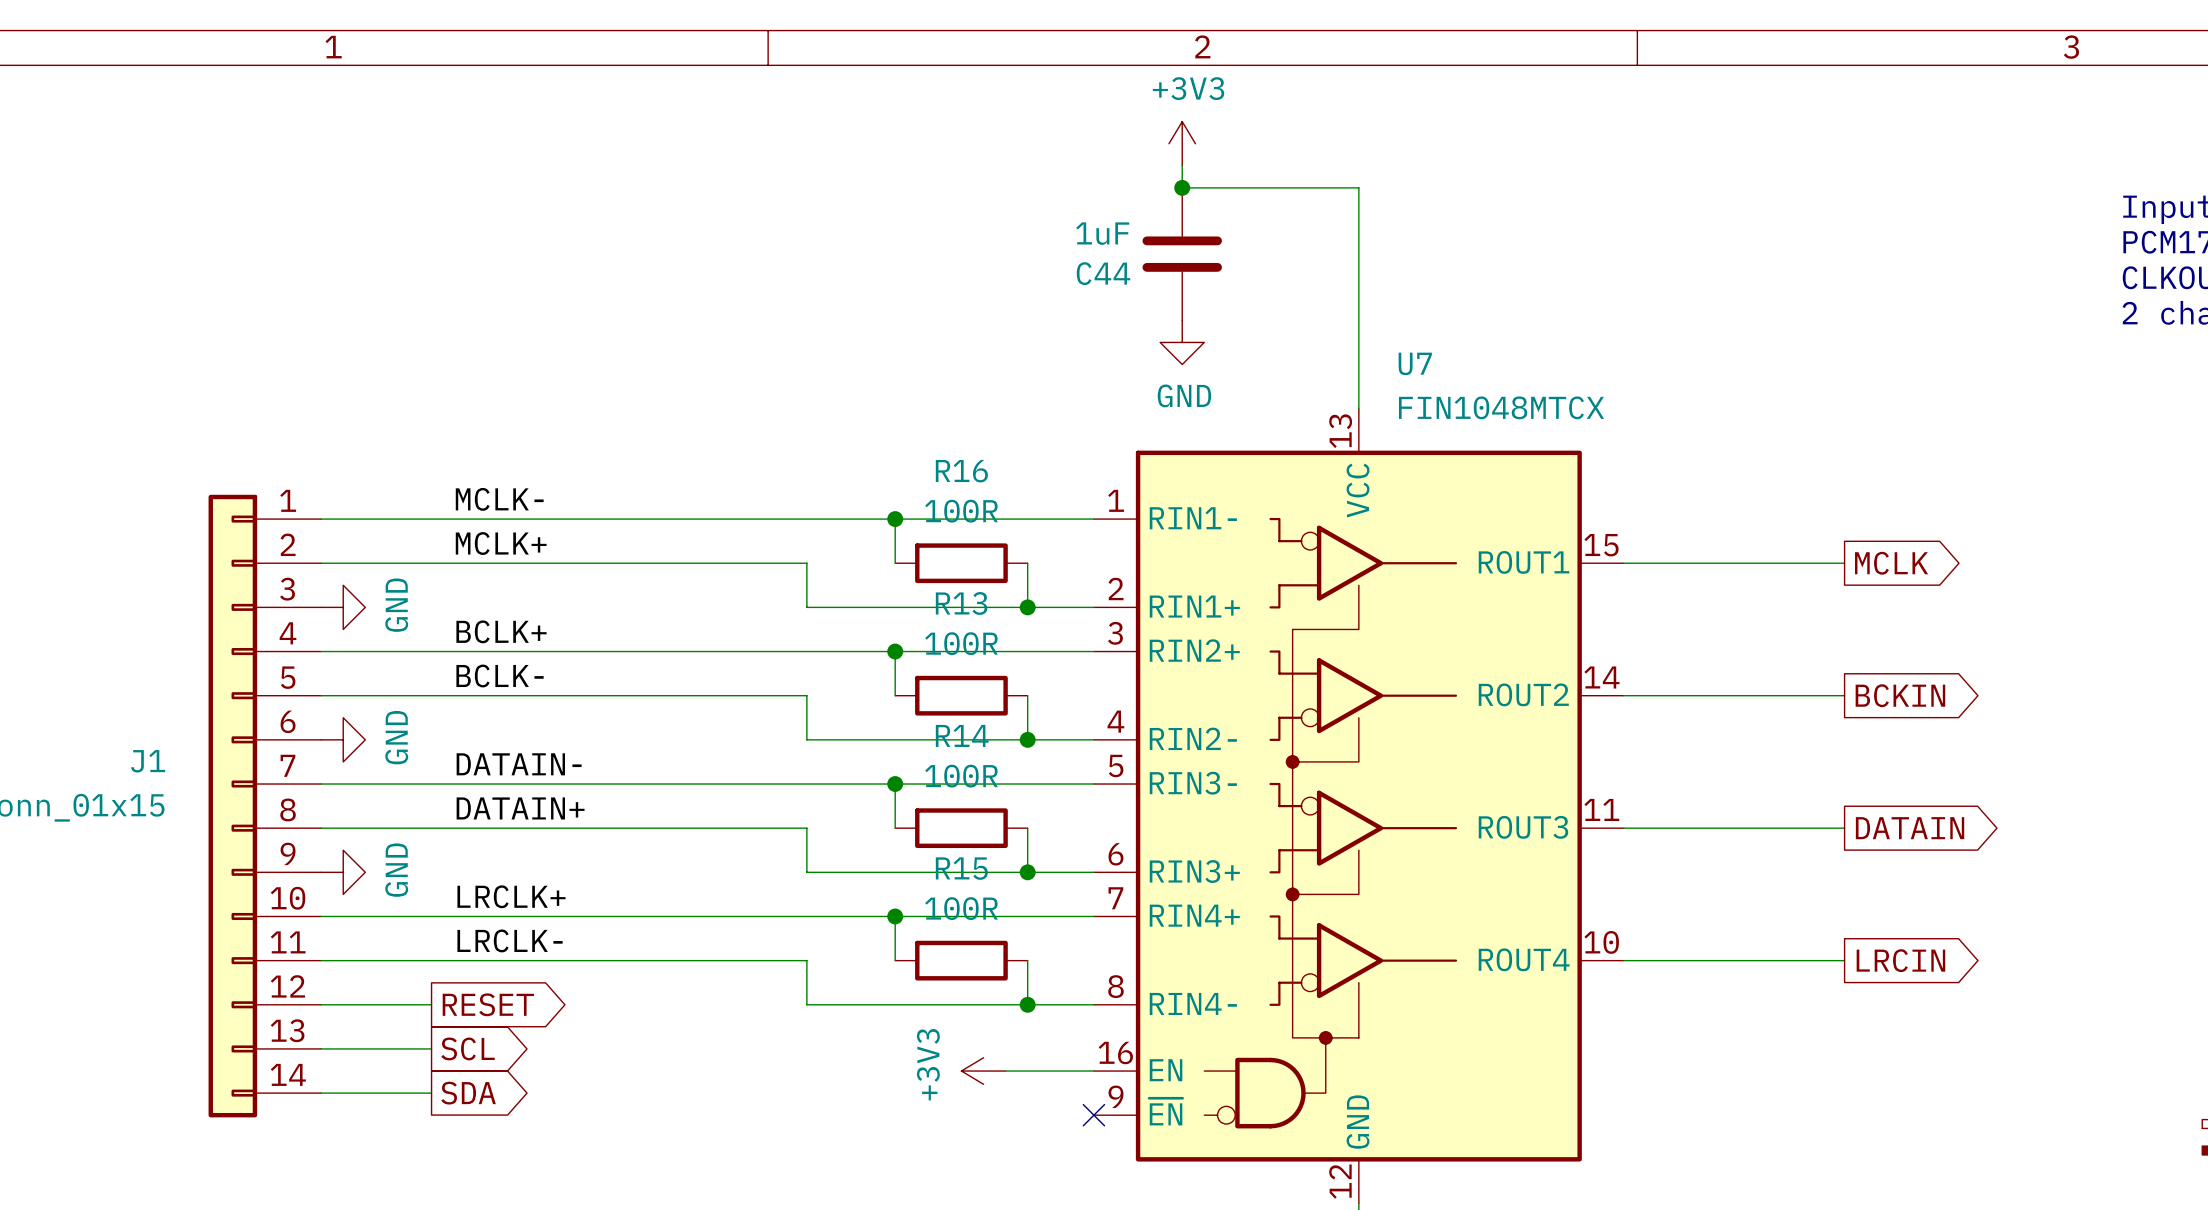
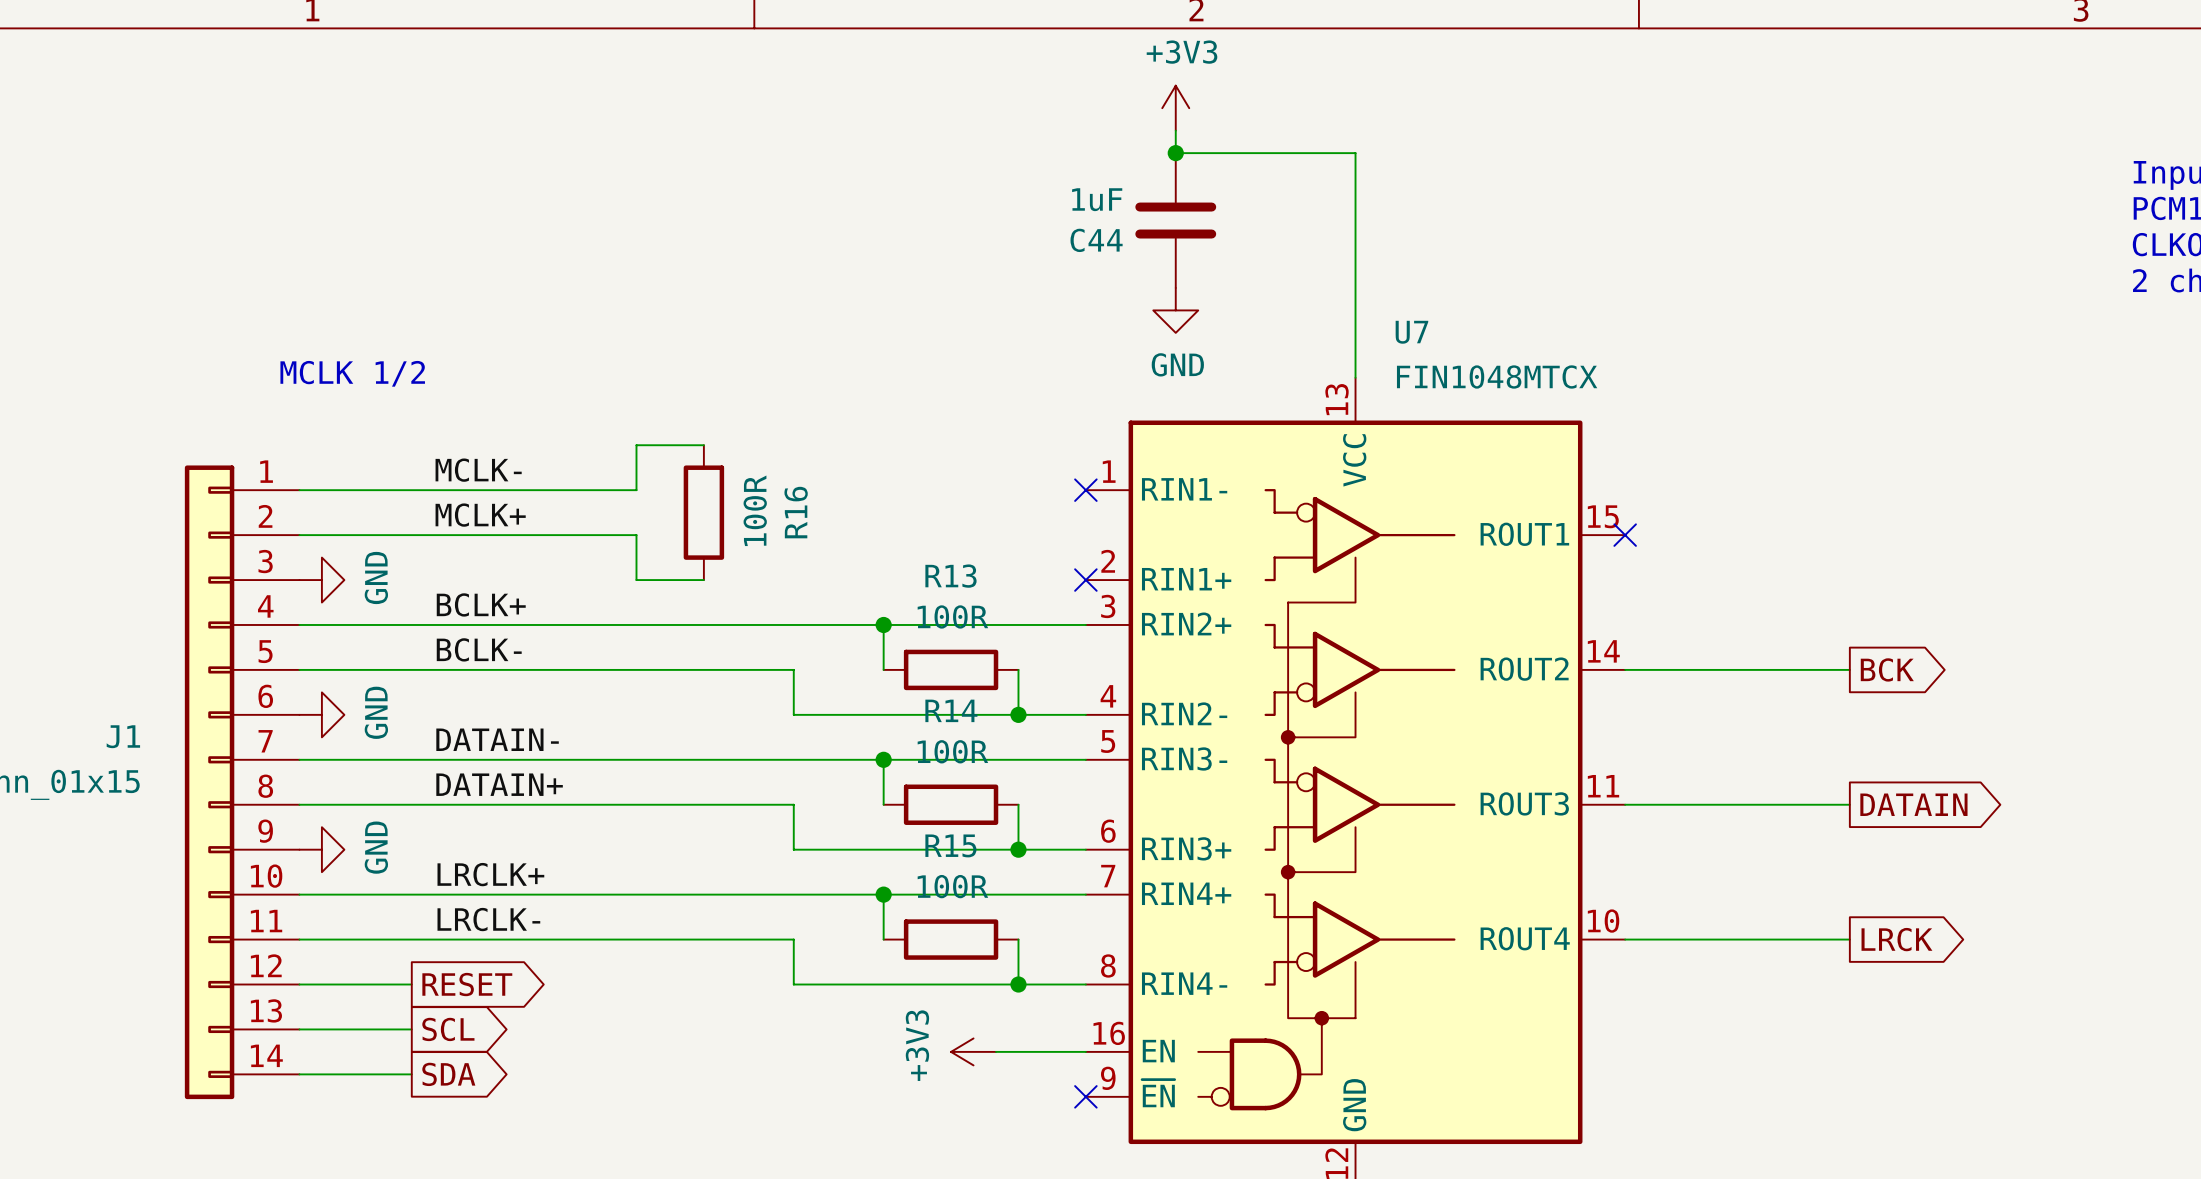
text: none -> MCLK 1/2 (352, 373)
wire: (652, 519) (1093, 519) -> (636, 490) (636, 445) (703, 445)
wire: (895, 519) (895, 563) -> none
junction: (895, 519) -> none
no-connect mark: none -> (1085, 490)
wire: (652, 563) (806, 563) (806, 607) (1093, 607) -> (636, 535) (636, 580) (703, 580)
R16 rotation: 0° (961, 563) -> 90° clockwise (703, 512)
R16 position: (961, 563) -> (703, 512)
wire: (1027, 563) (1027, 607) -> none
wire: (1623, 563) (1844, 563) -> none
no-connect mark: none -> (1625, 535)
global label: MCLK (1891, 563) -> none
junction: (1027, 607) -> none
no-connect mark: none -> (1085, 580)
global label: BCKIN (1900, 695) -> BCK (1887, 669)
global label: LRCIN (1900, 960) -> LRCK (1896, 939)

